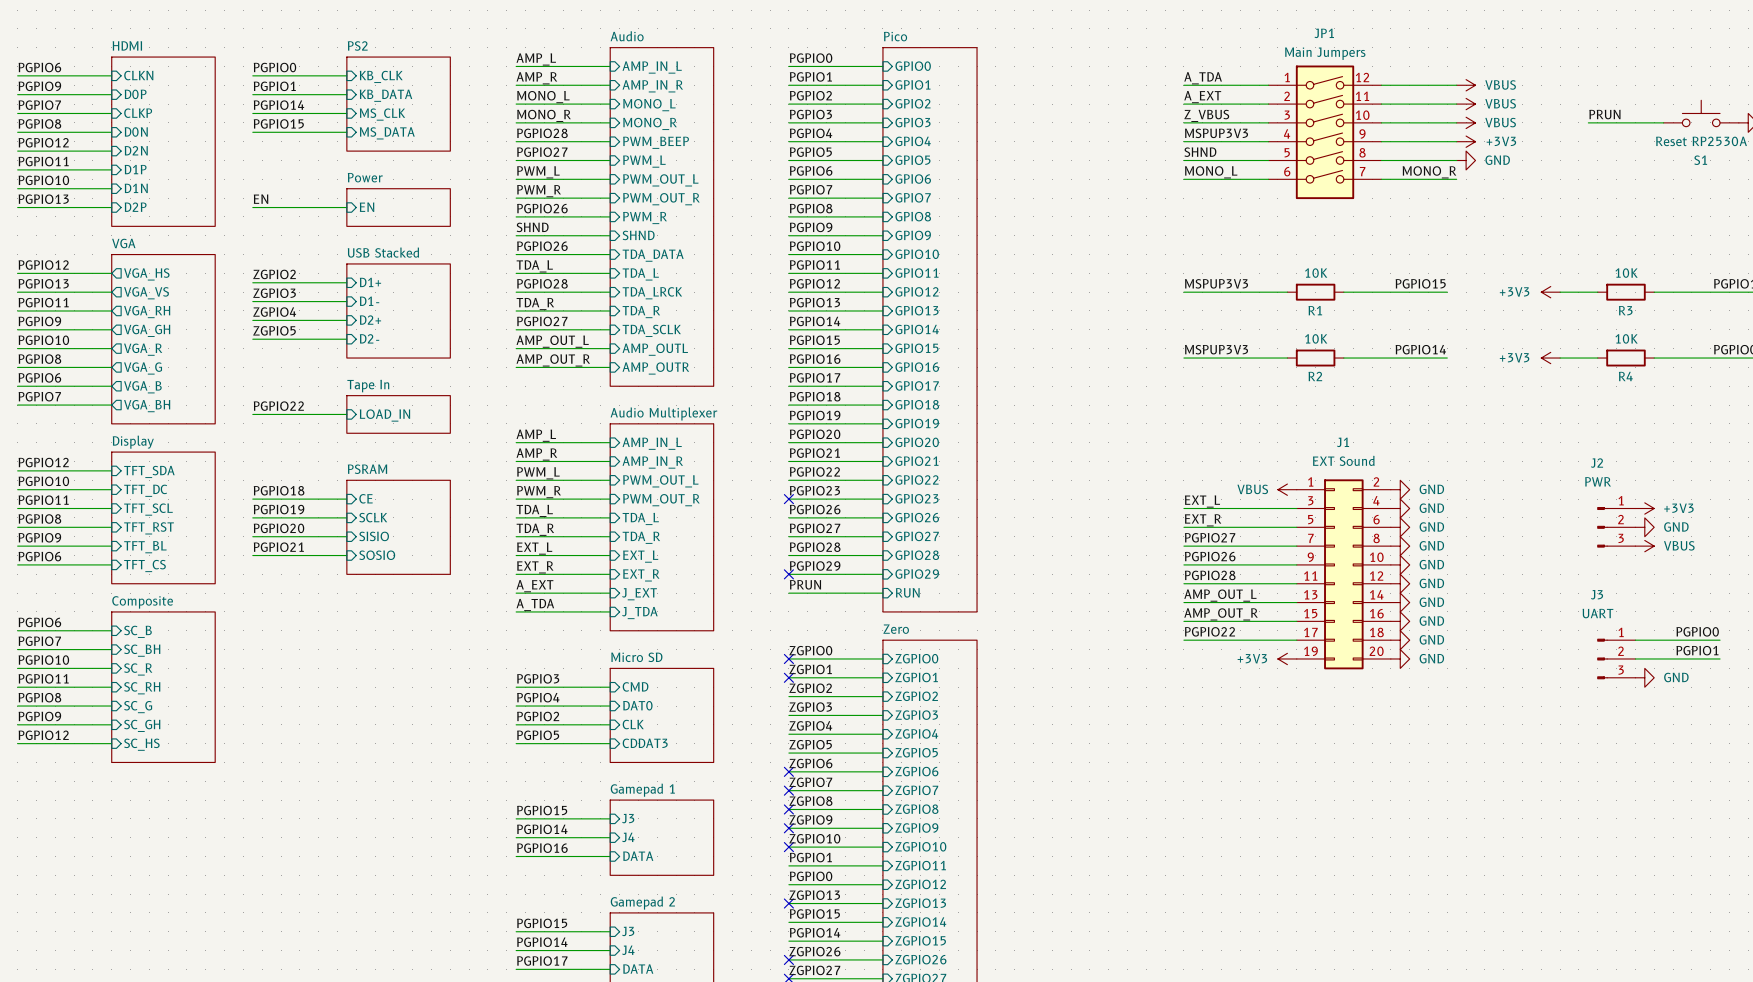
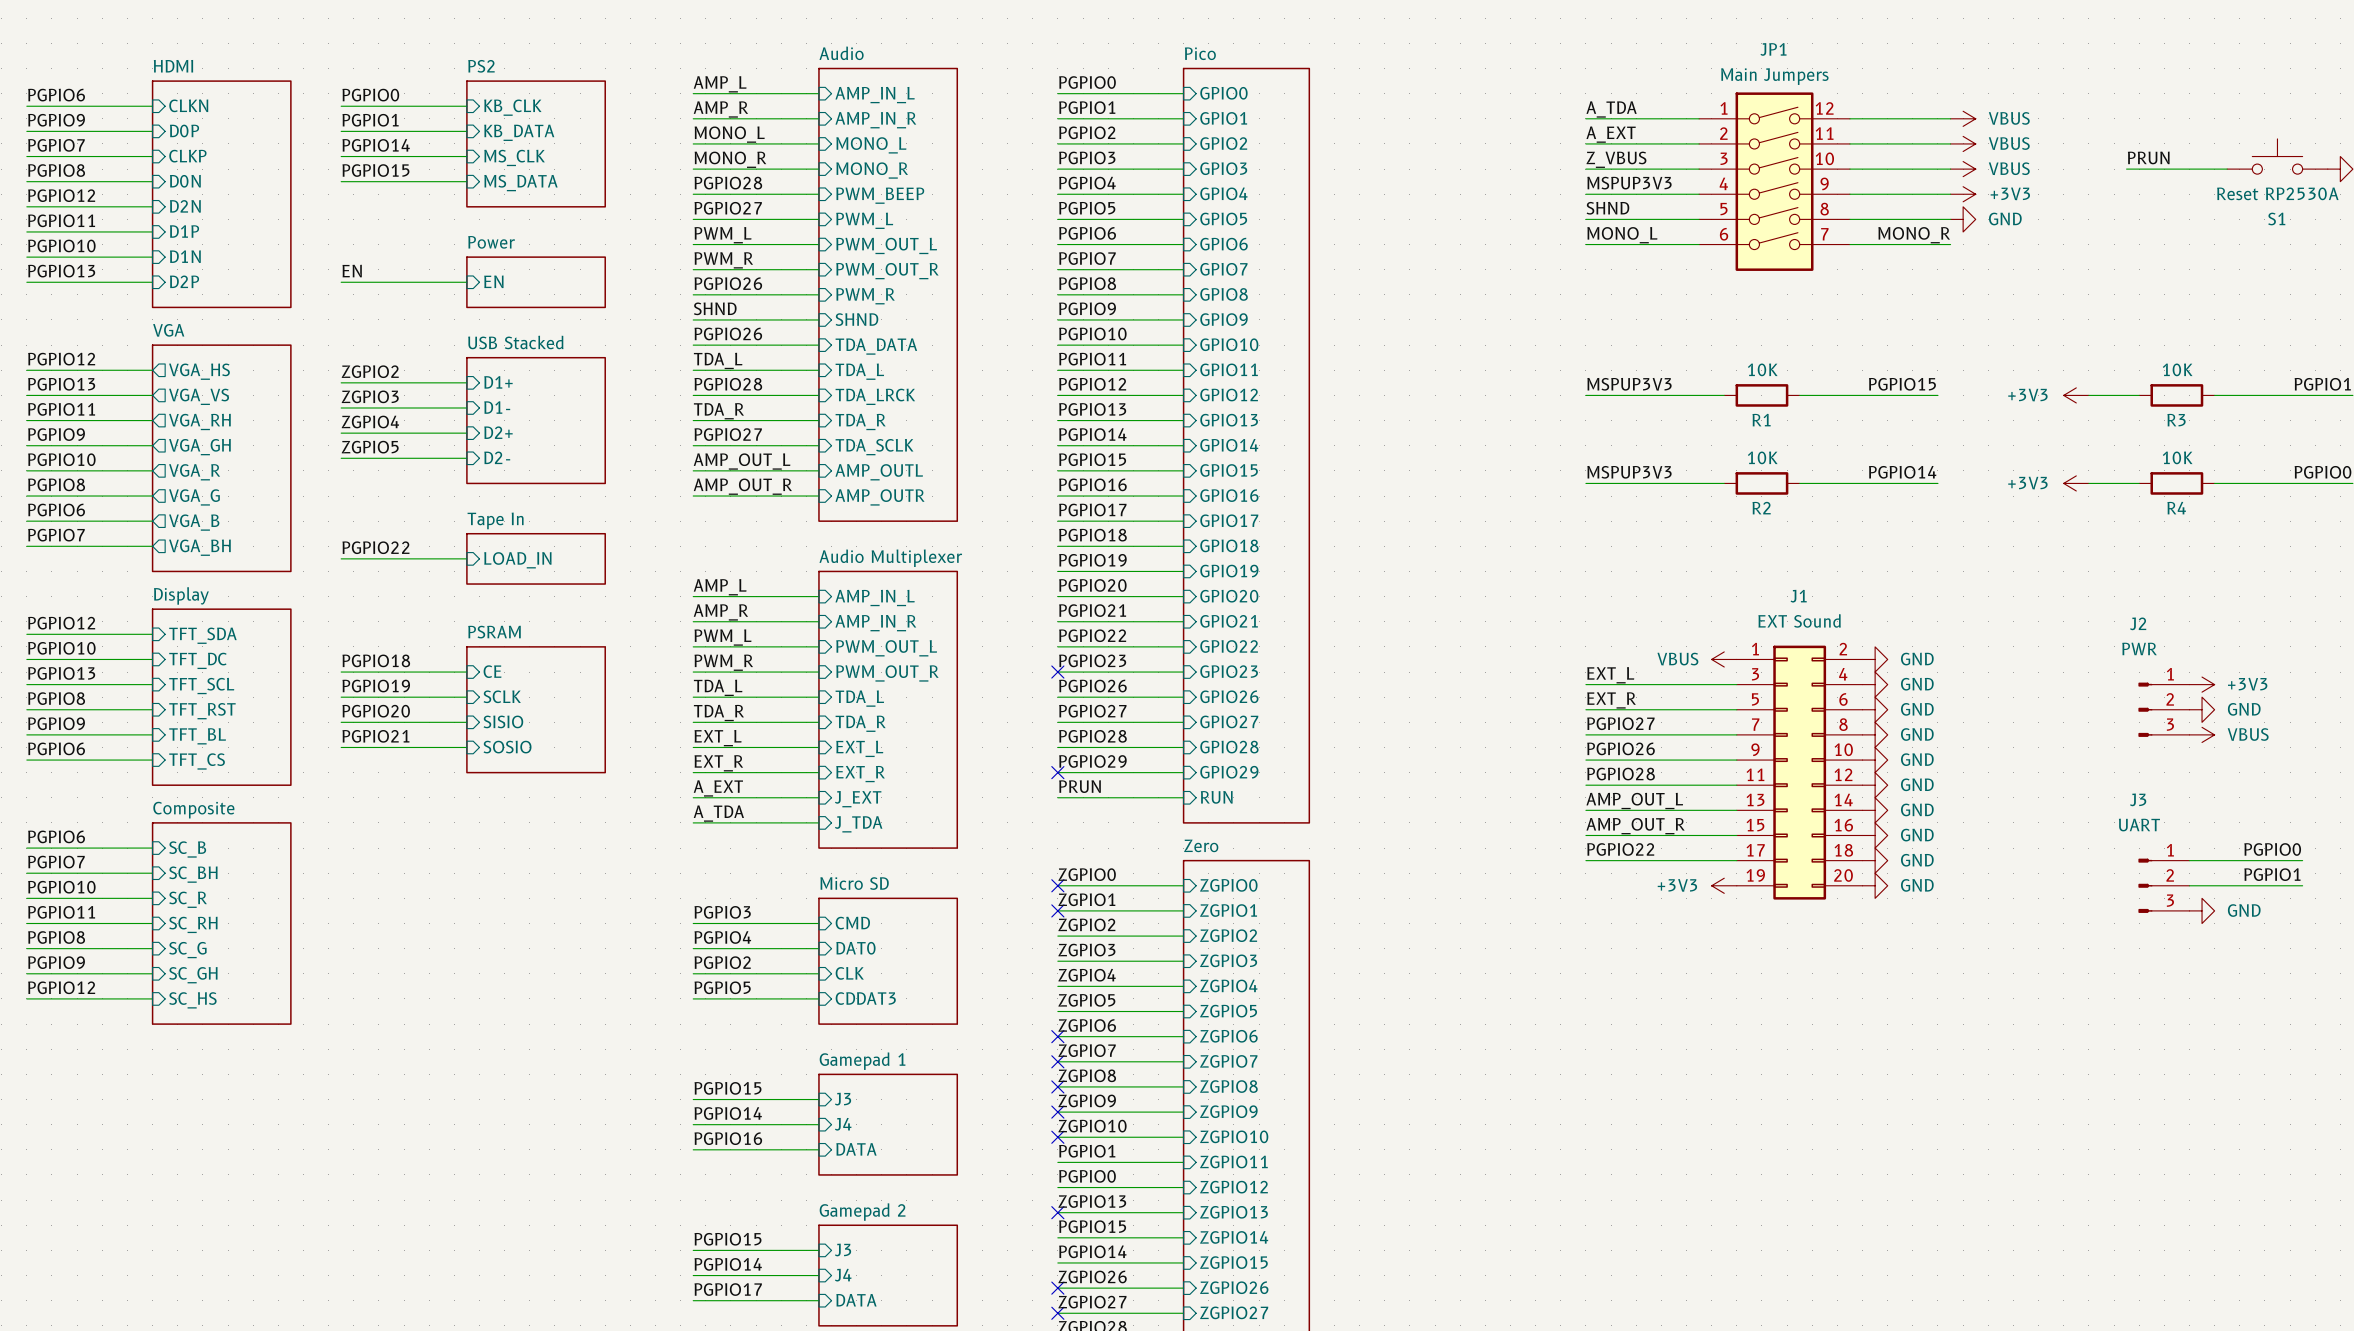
label: PGPIO11 (43, 500) -> PGPIO13 (61, 673)

